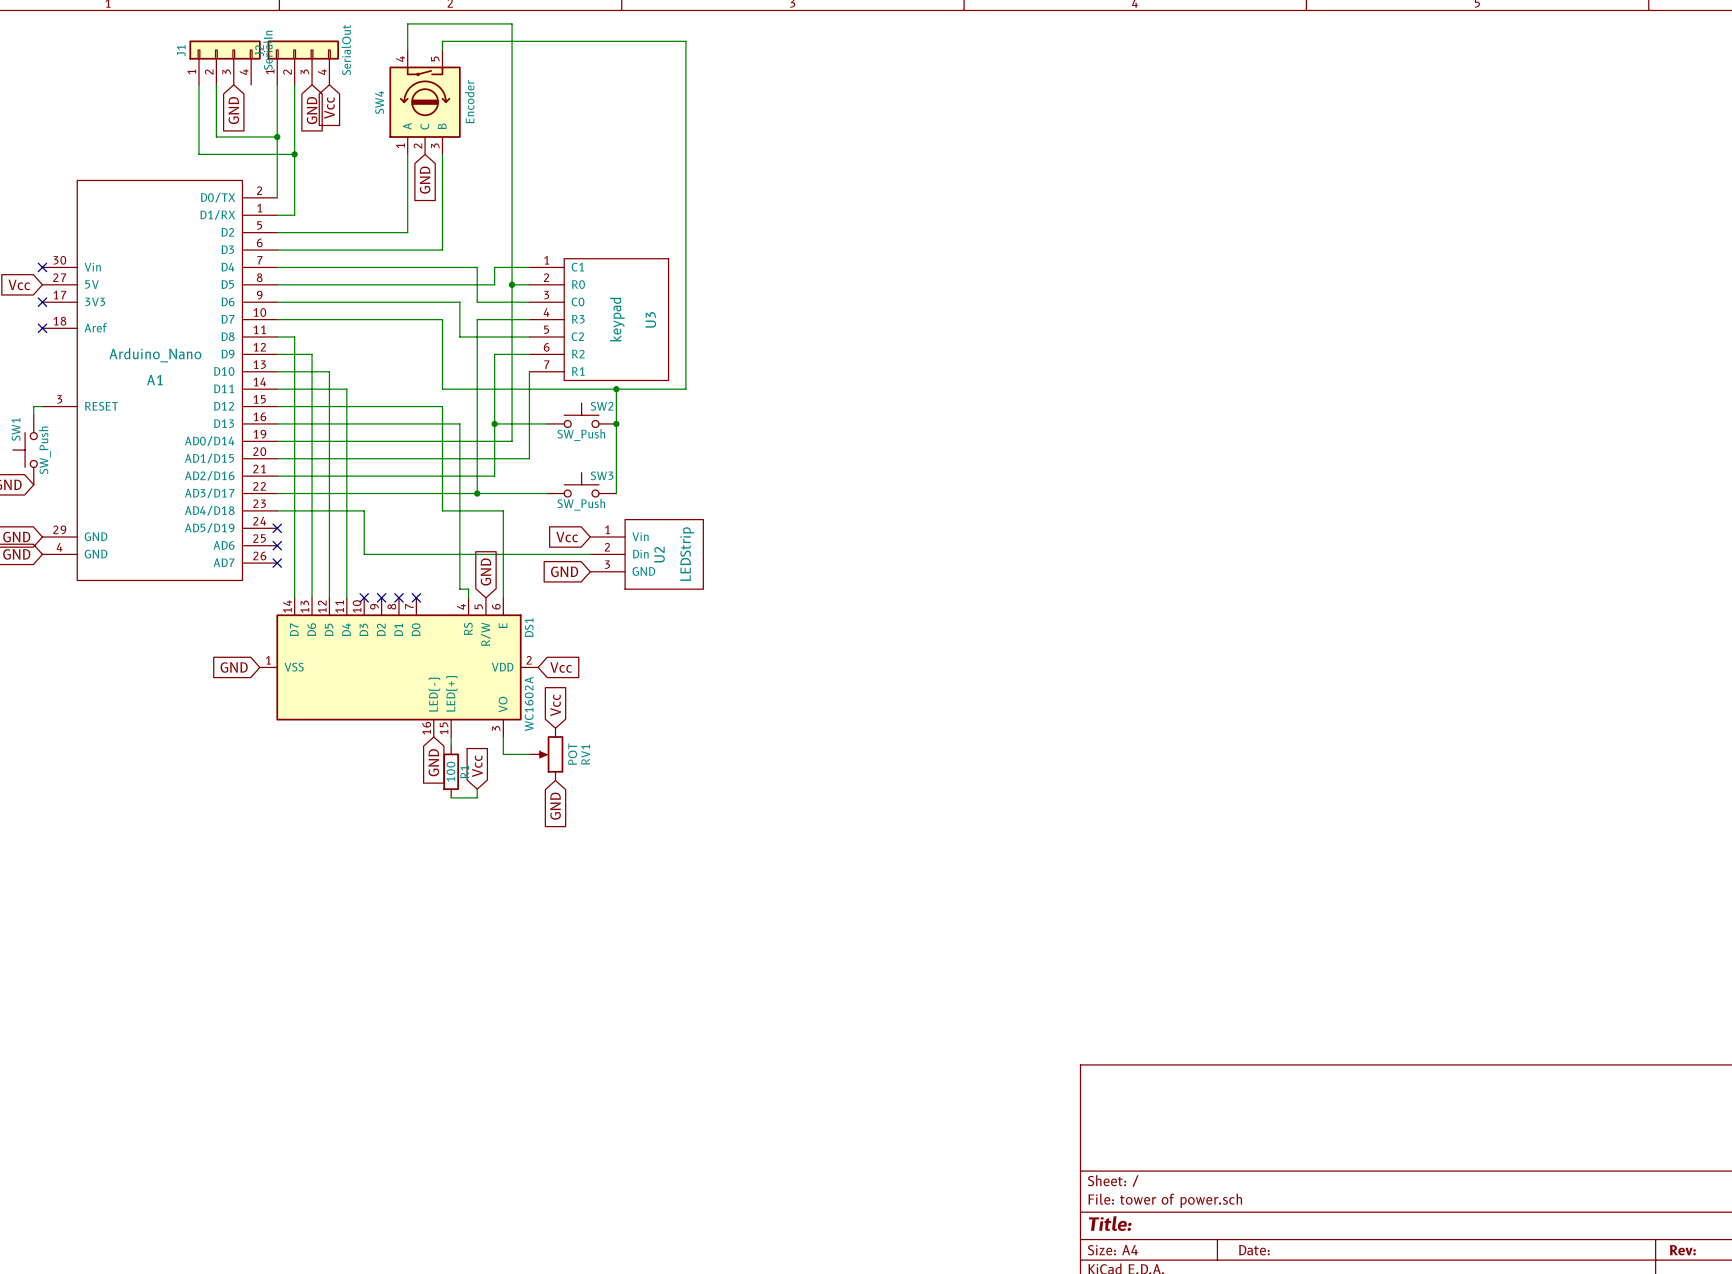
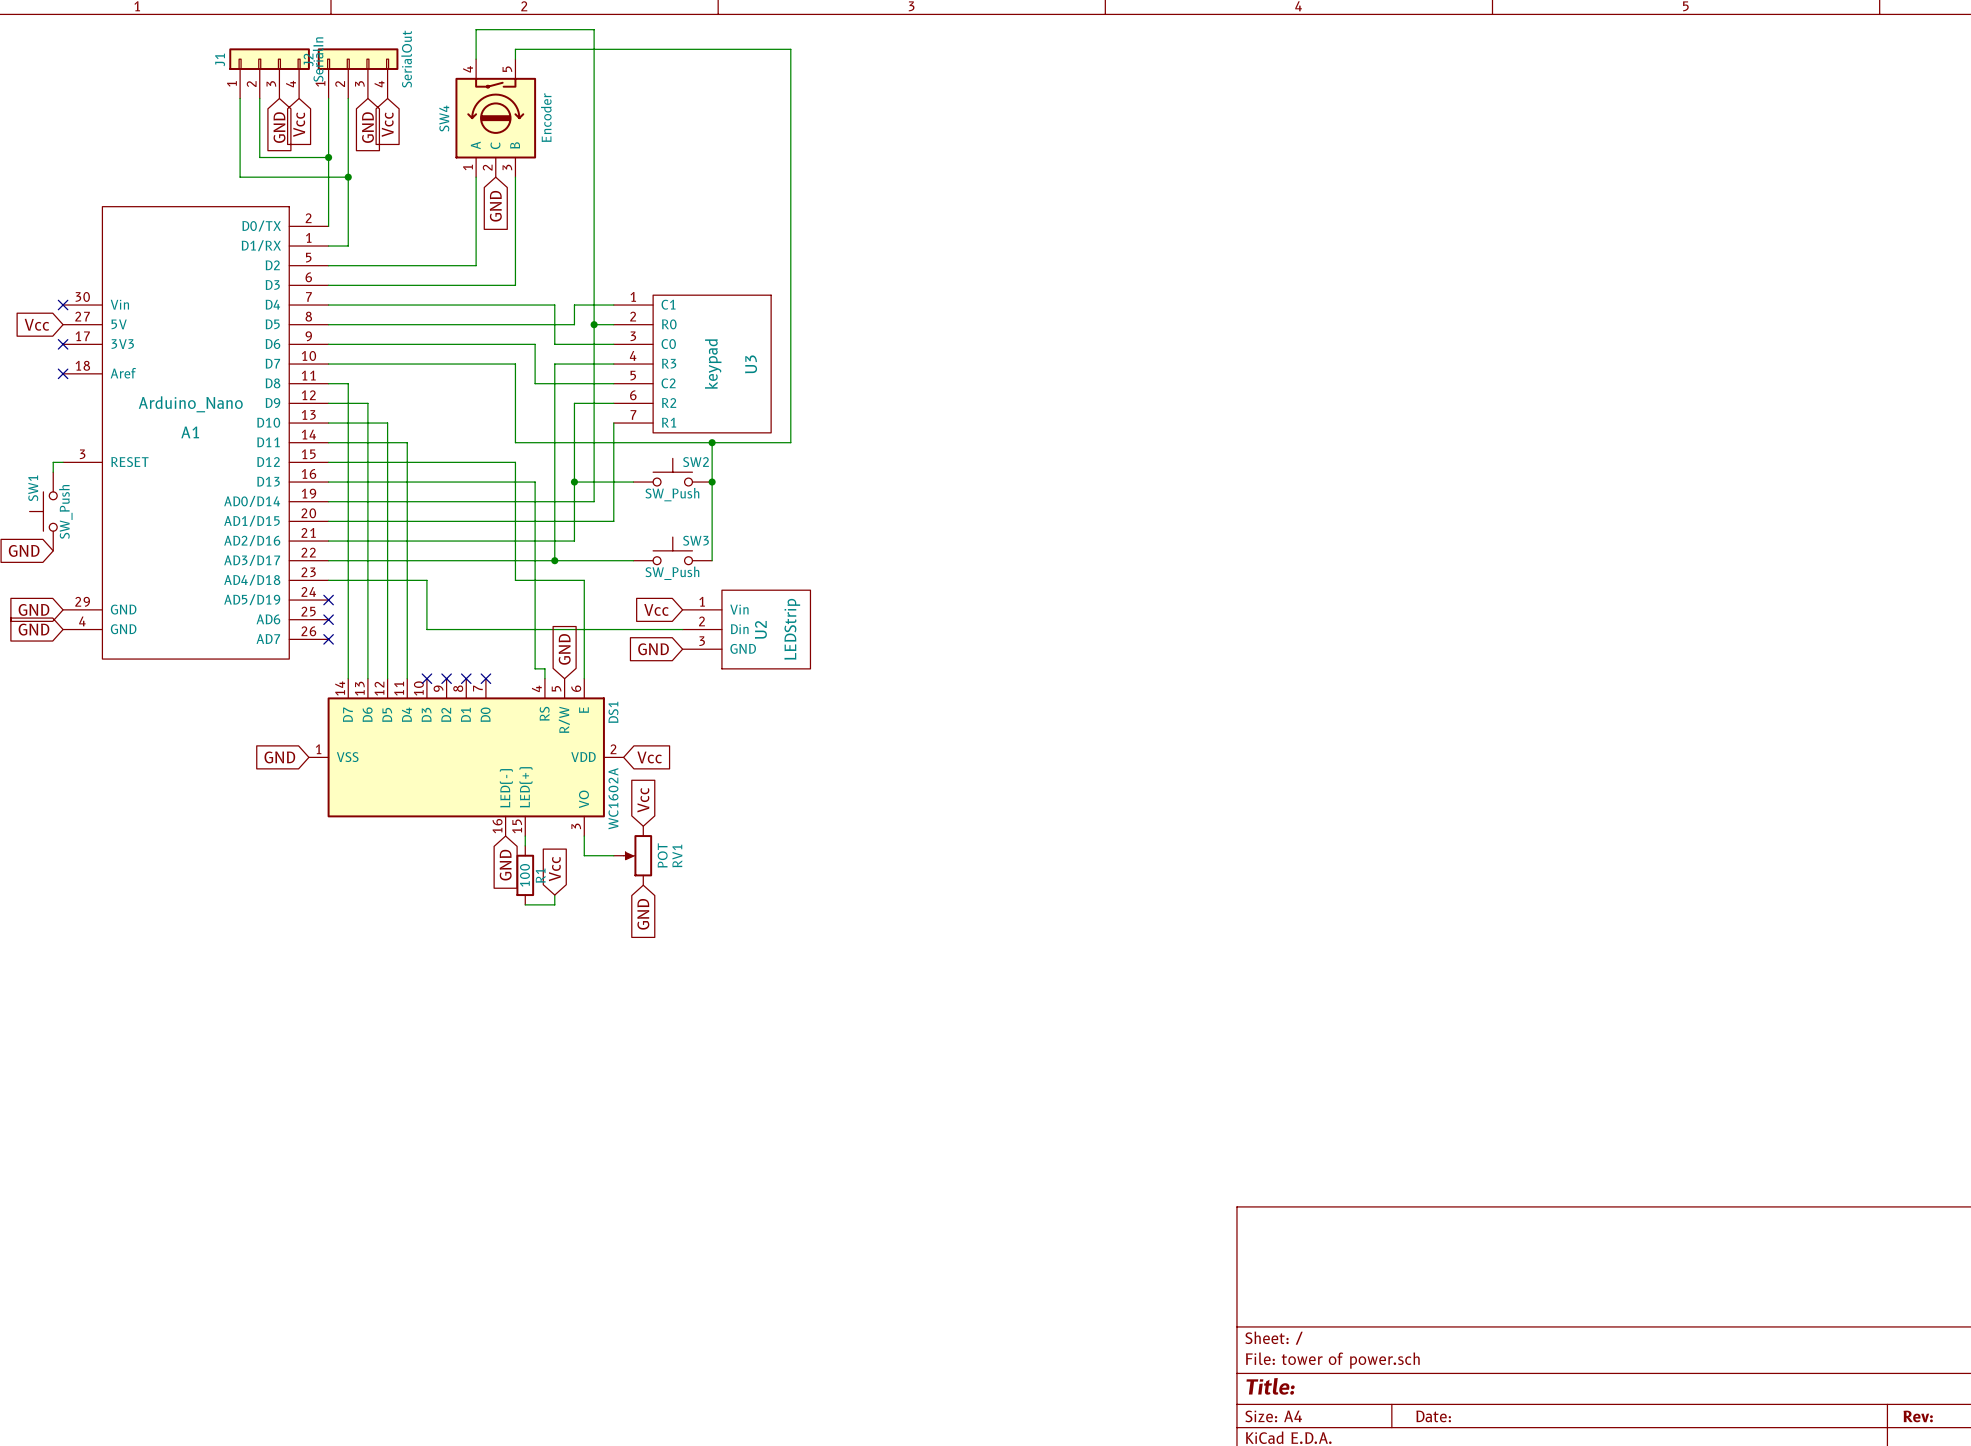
global label: none -> Vcc (299, 124)

